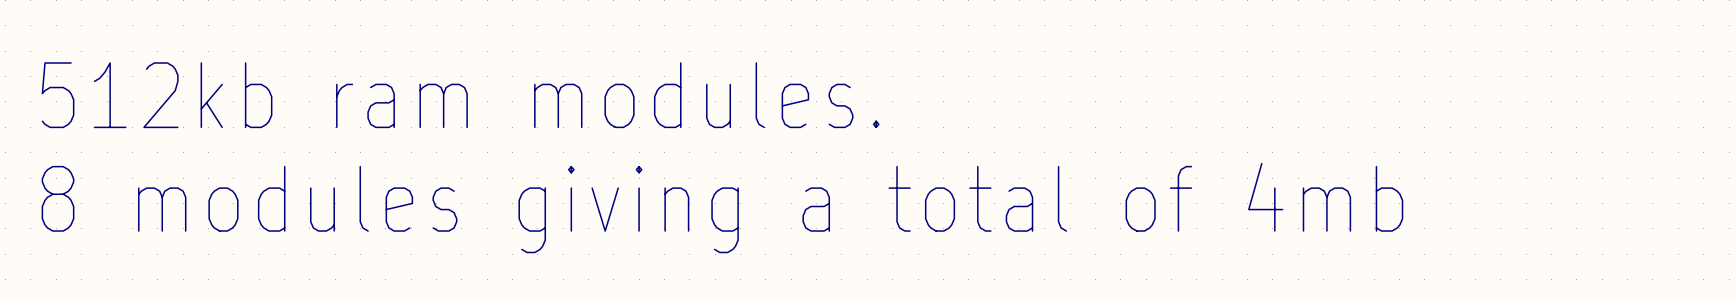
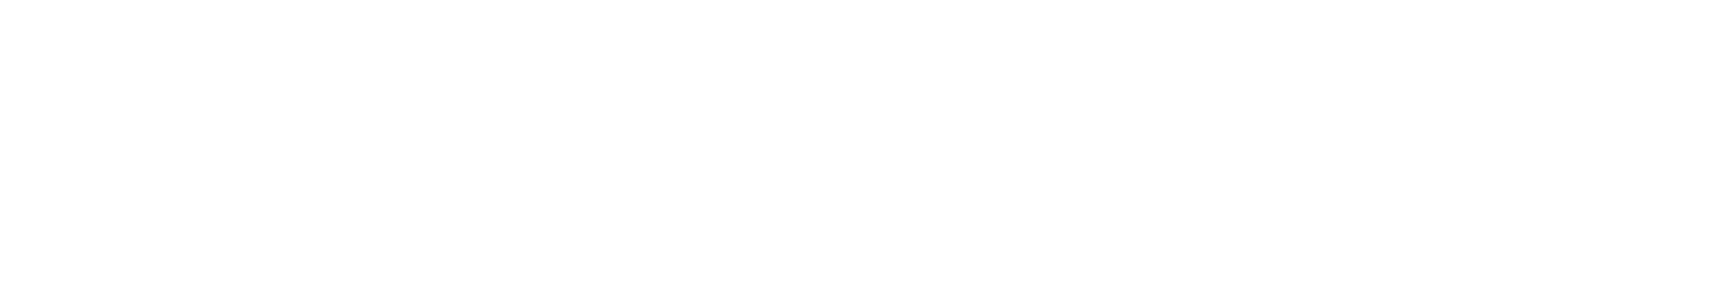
text: 512kb ram modules. (460, 95) -> none
text: 8 modules giving a total of 4mb (722, 208) -> none

